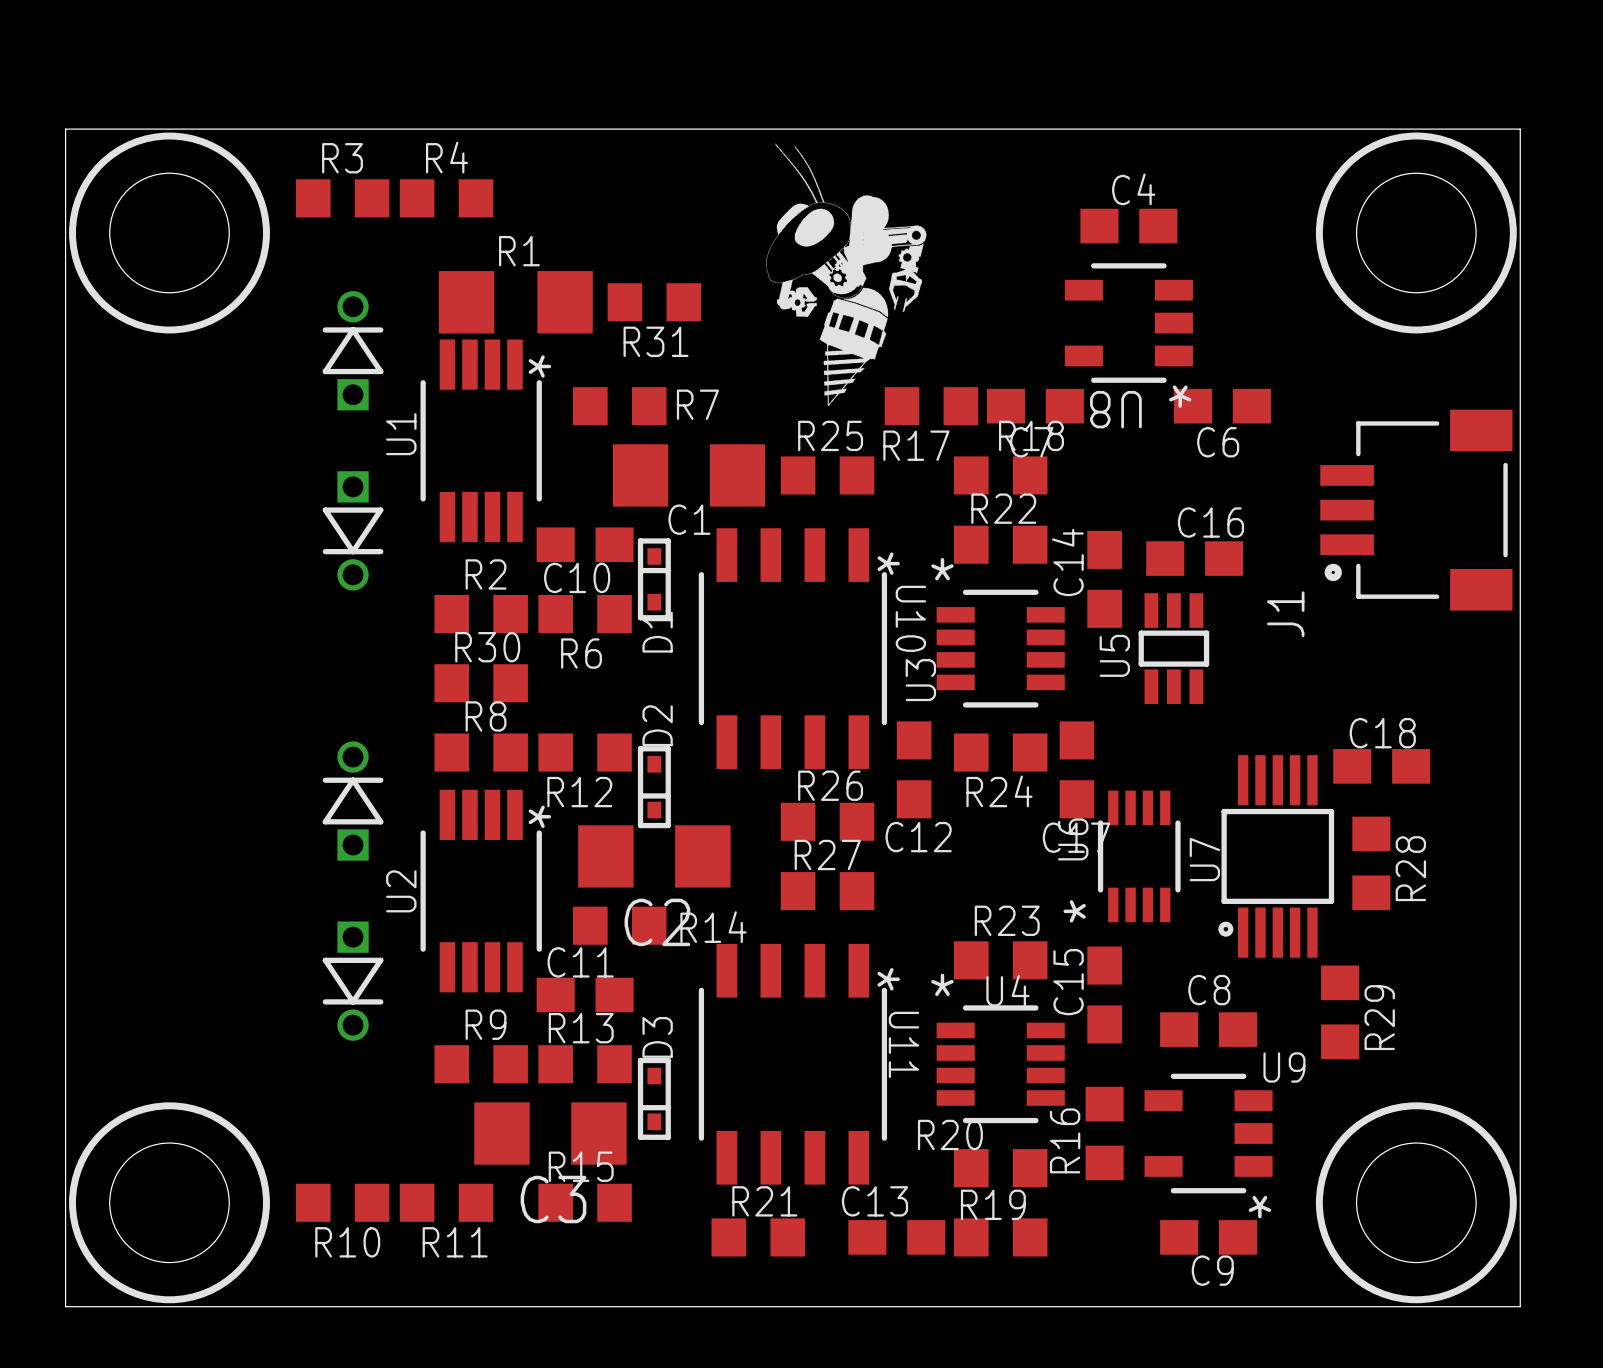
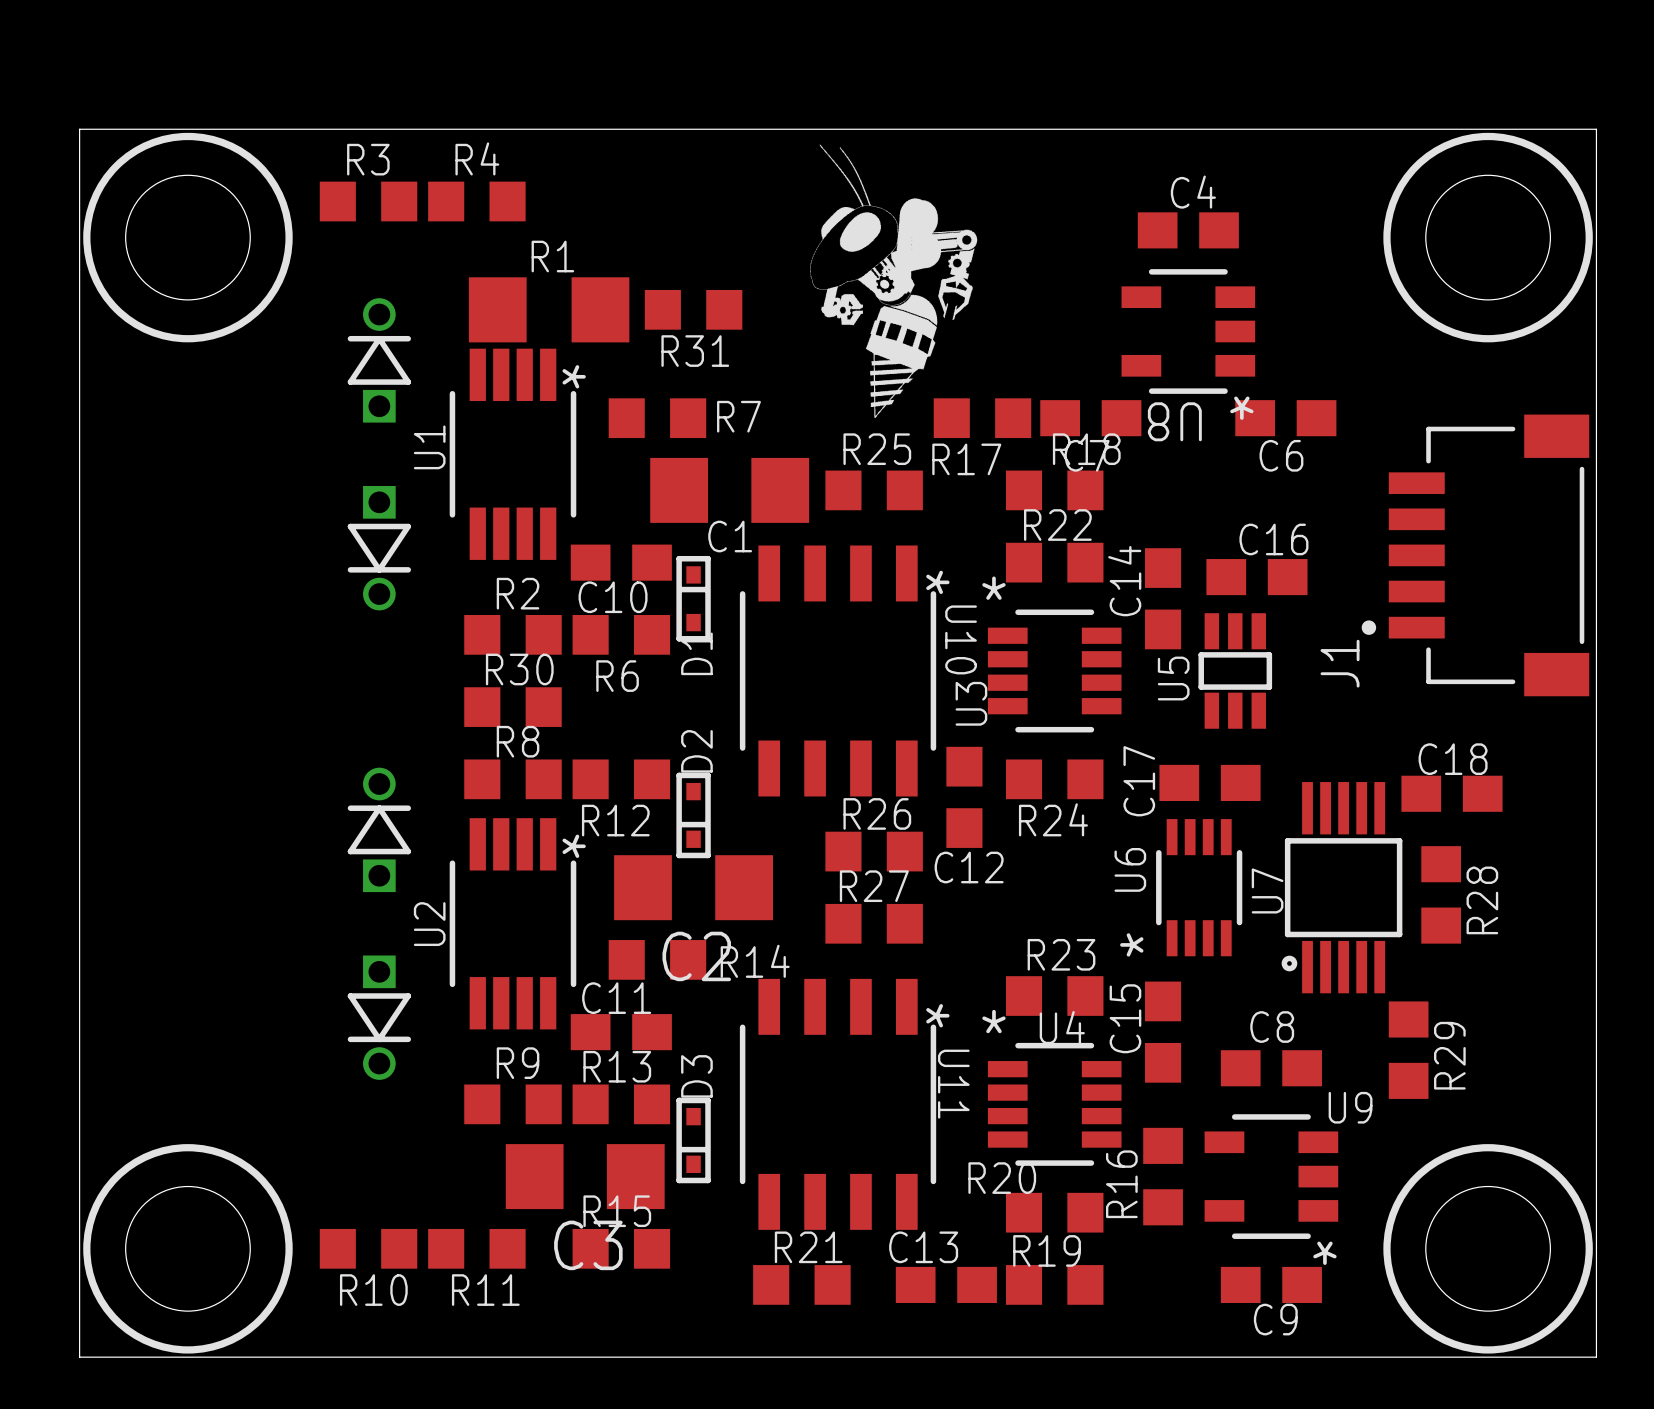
J1 footprint: [1320, 409, 1513, 611] -> [1361, 414, 1590, 697]
C17 rotation: 0° (1076, 769) -> 90° clockwise (1210, 782)
C17 position: (1076, 769) -> (1210, 782)

